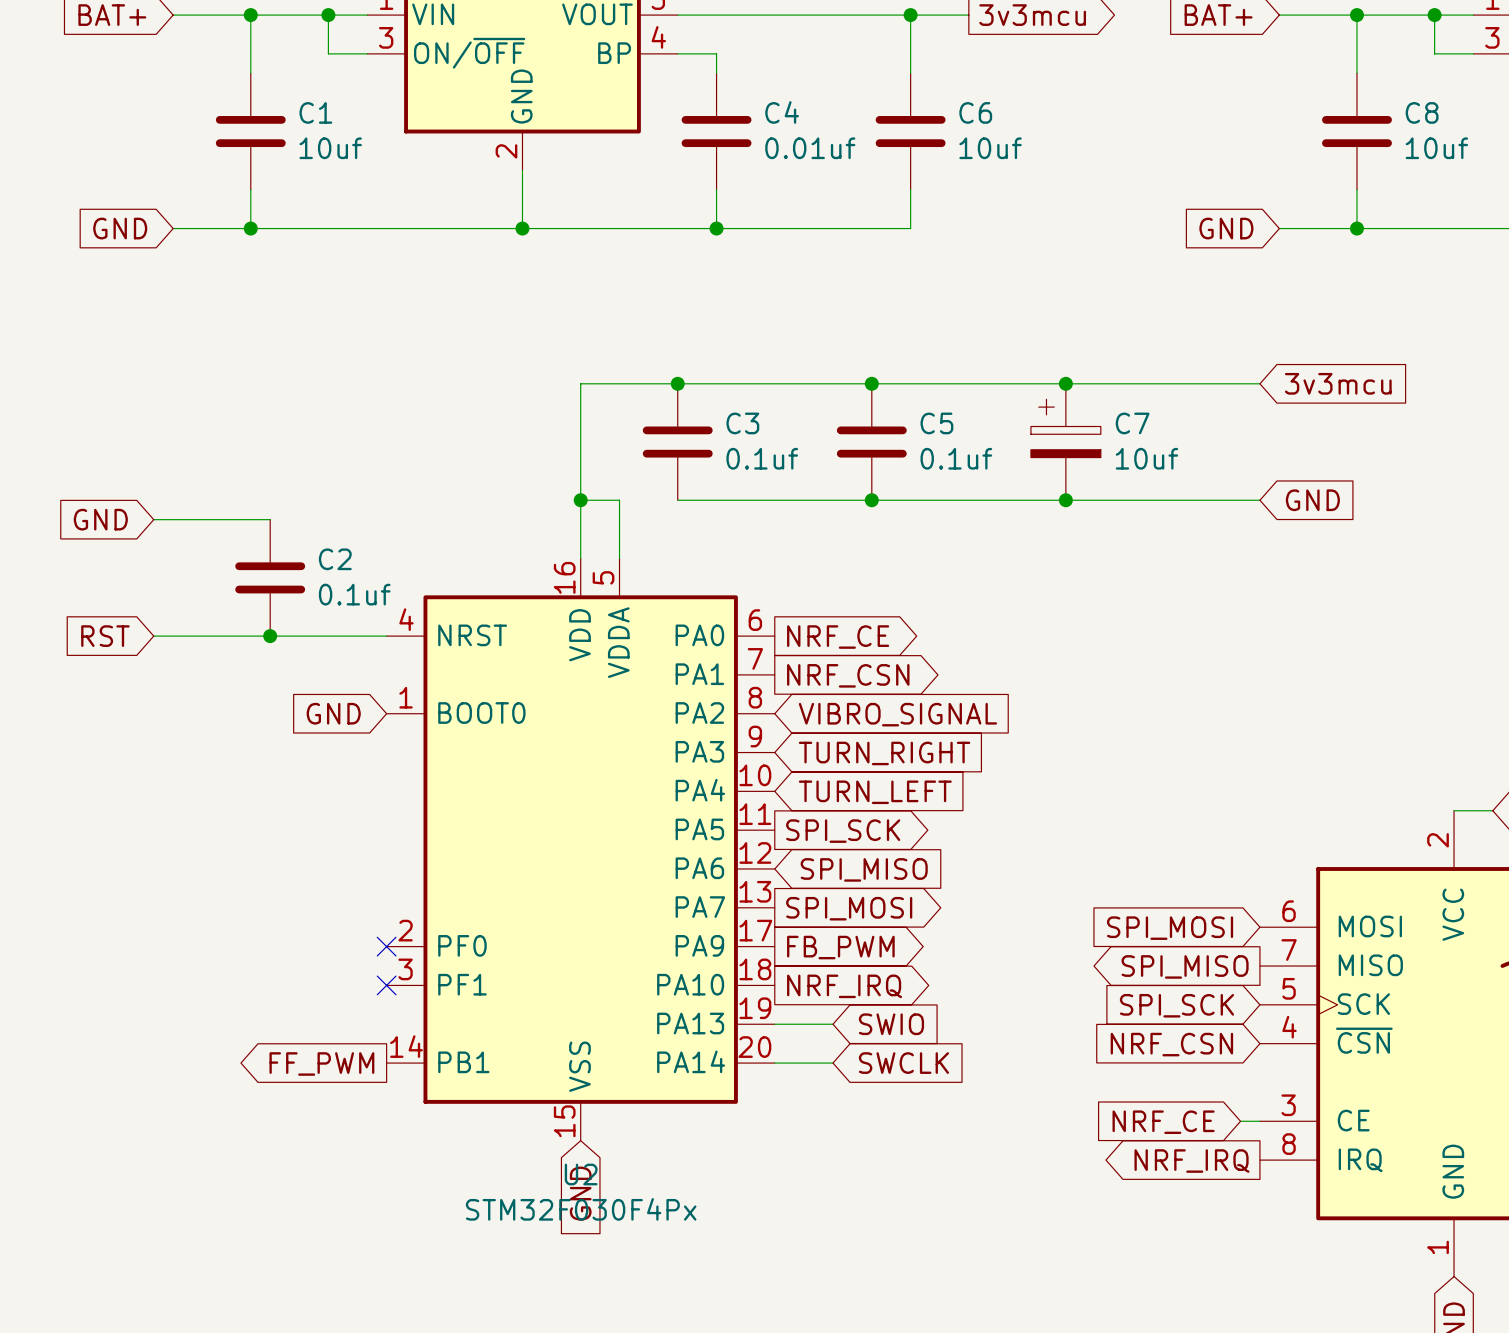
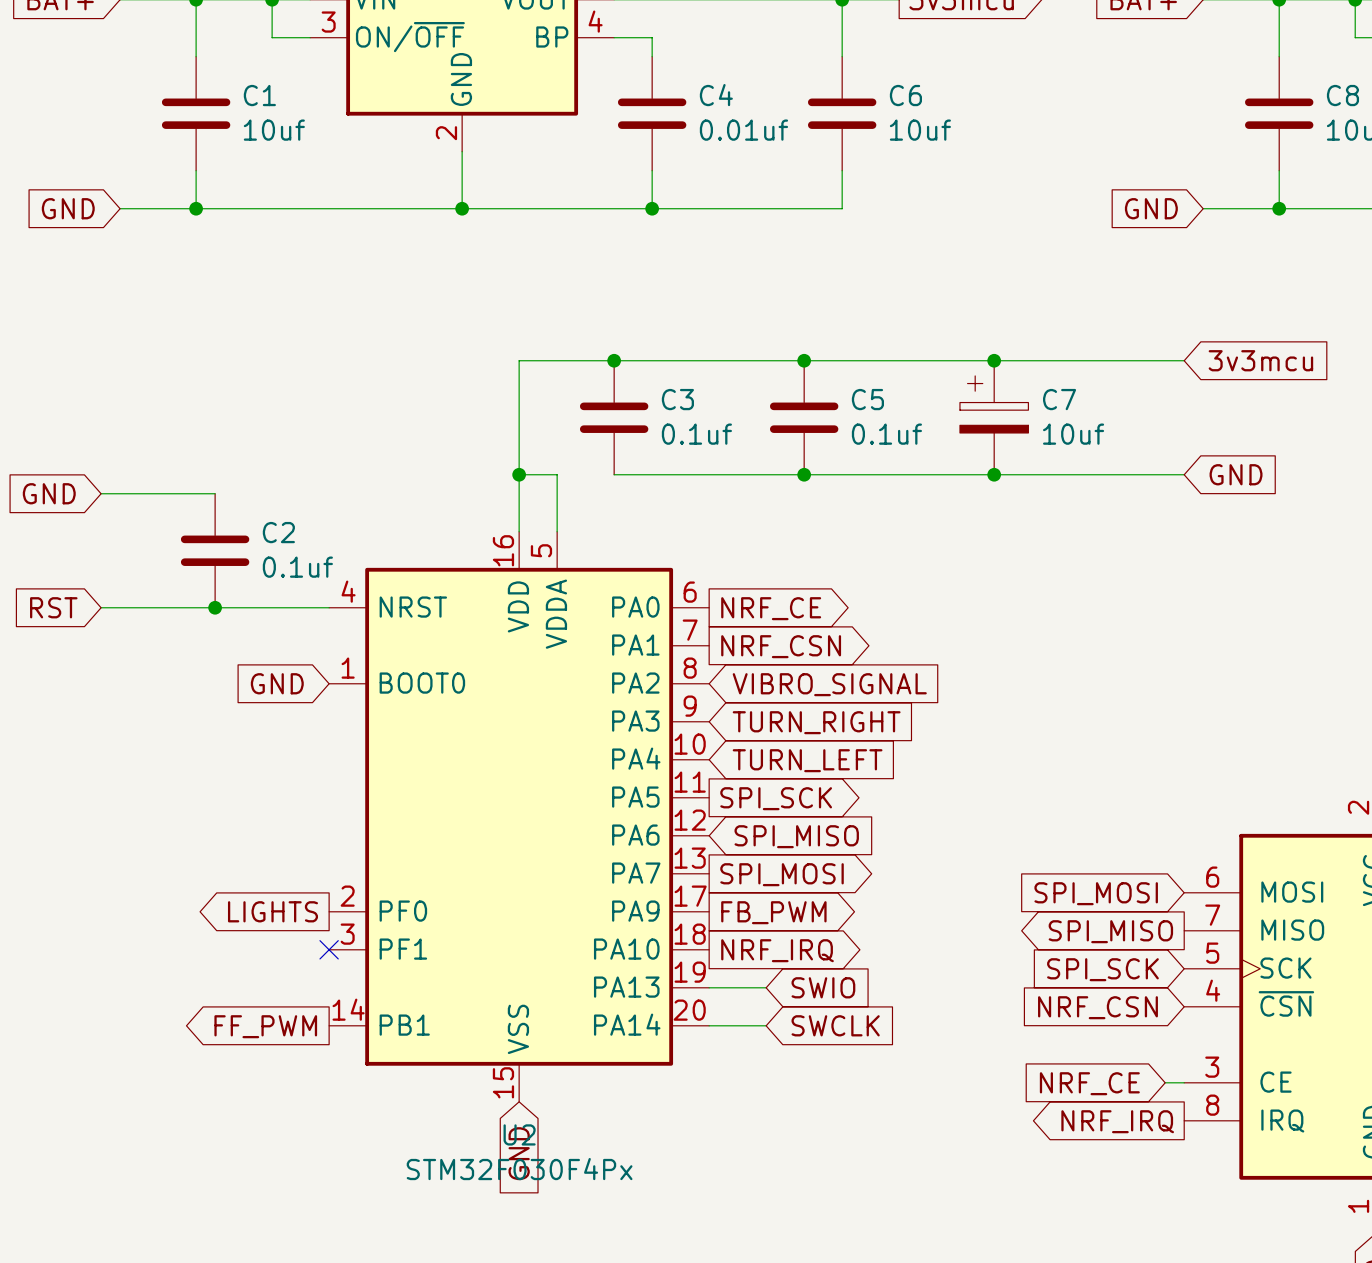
global label: none -> LIGHTS (272, 911)
no-connect mark: (386, 946) -> none

